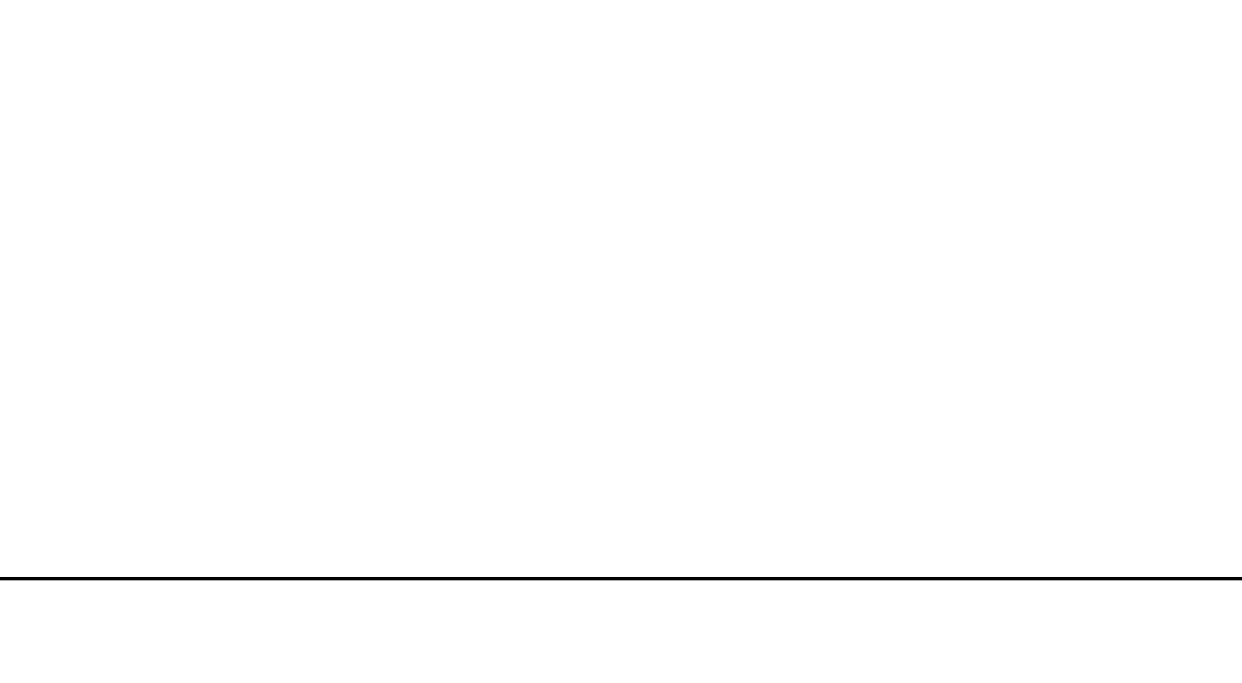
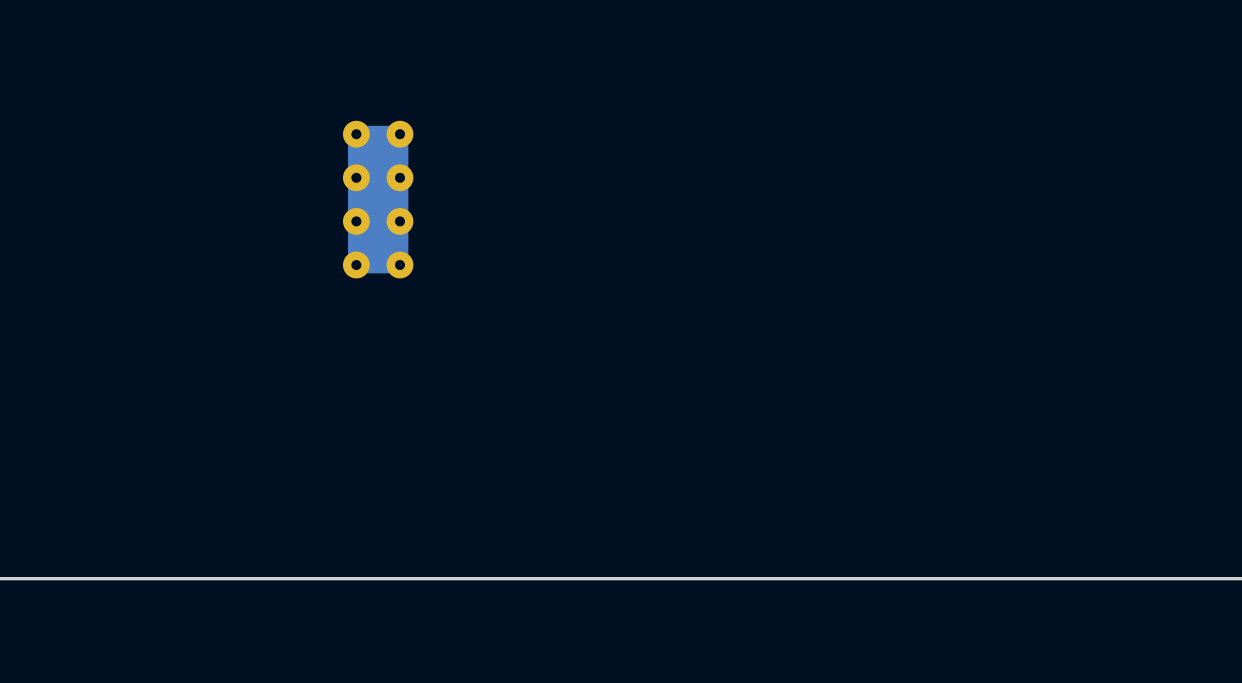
part: none -> (378, 199)

